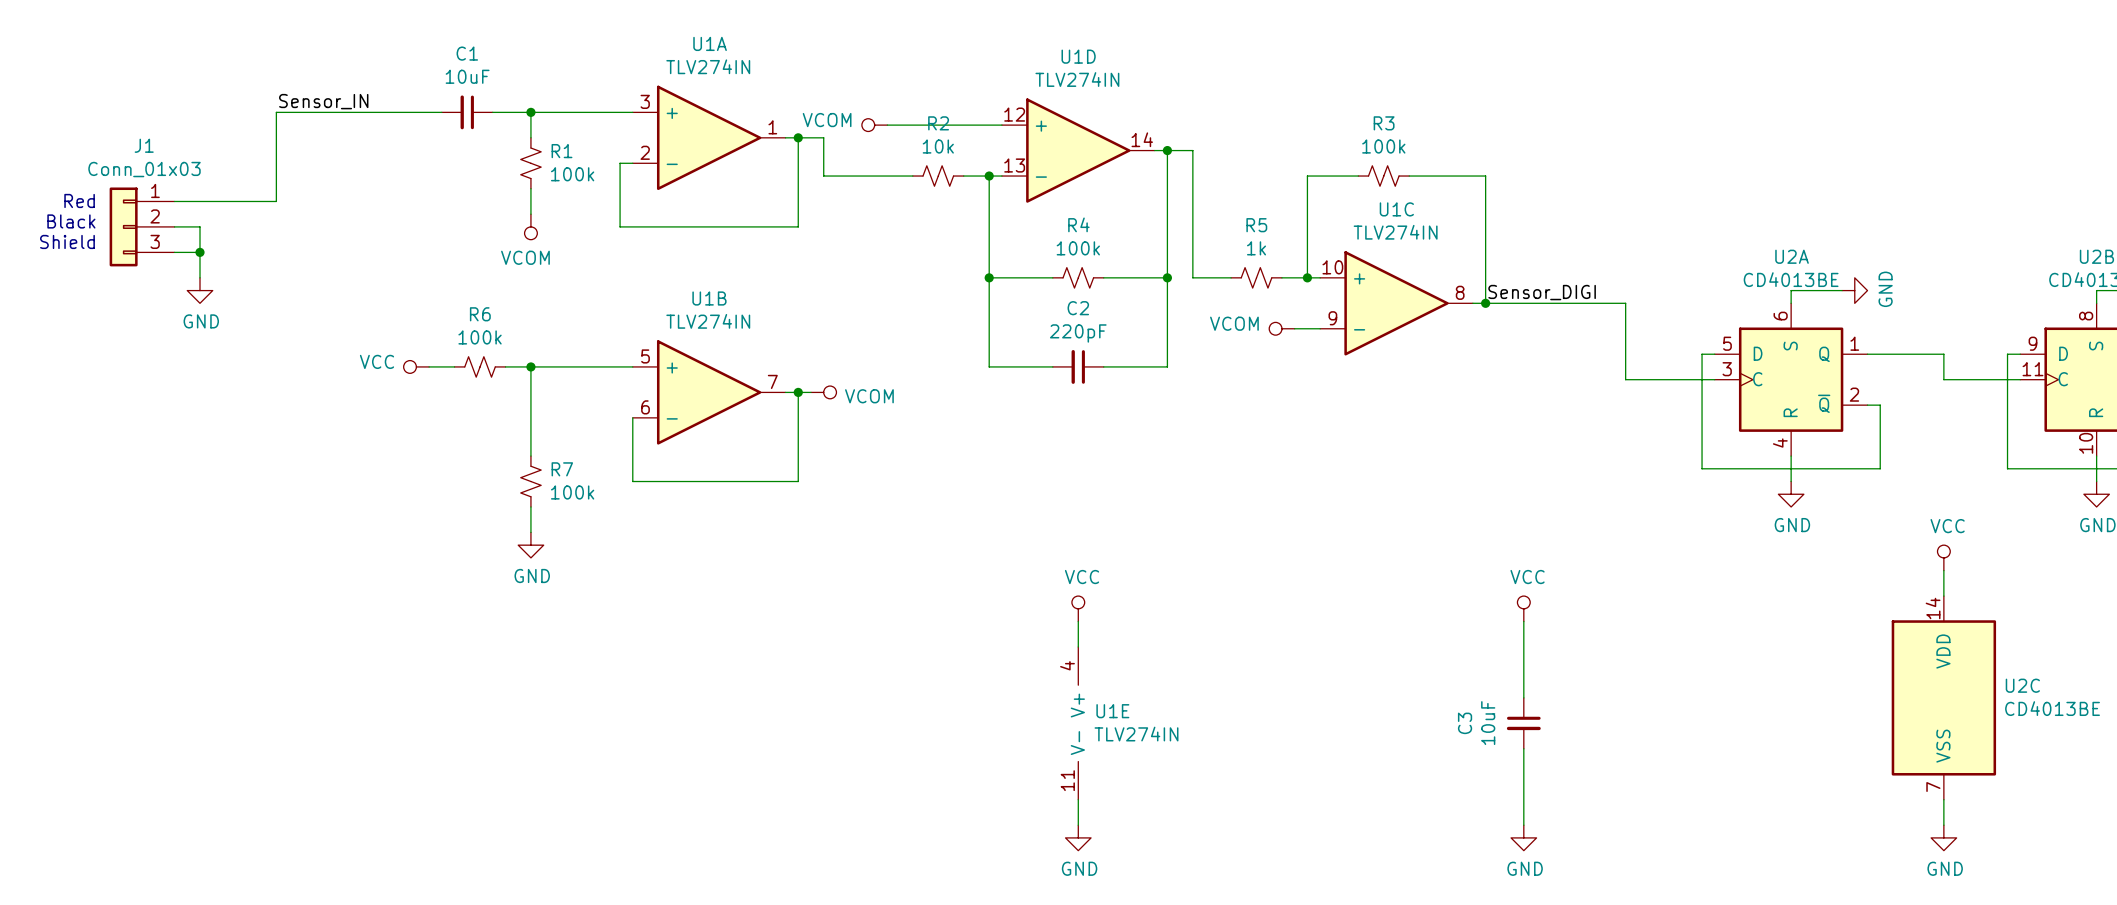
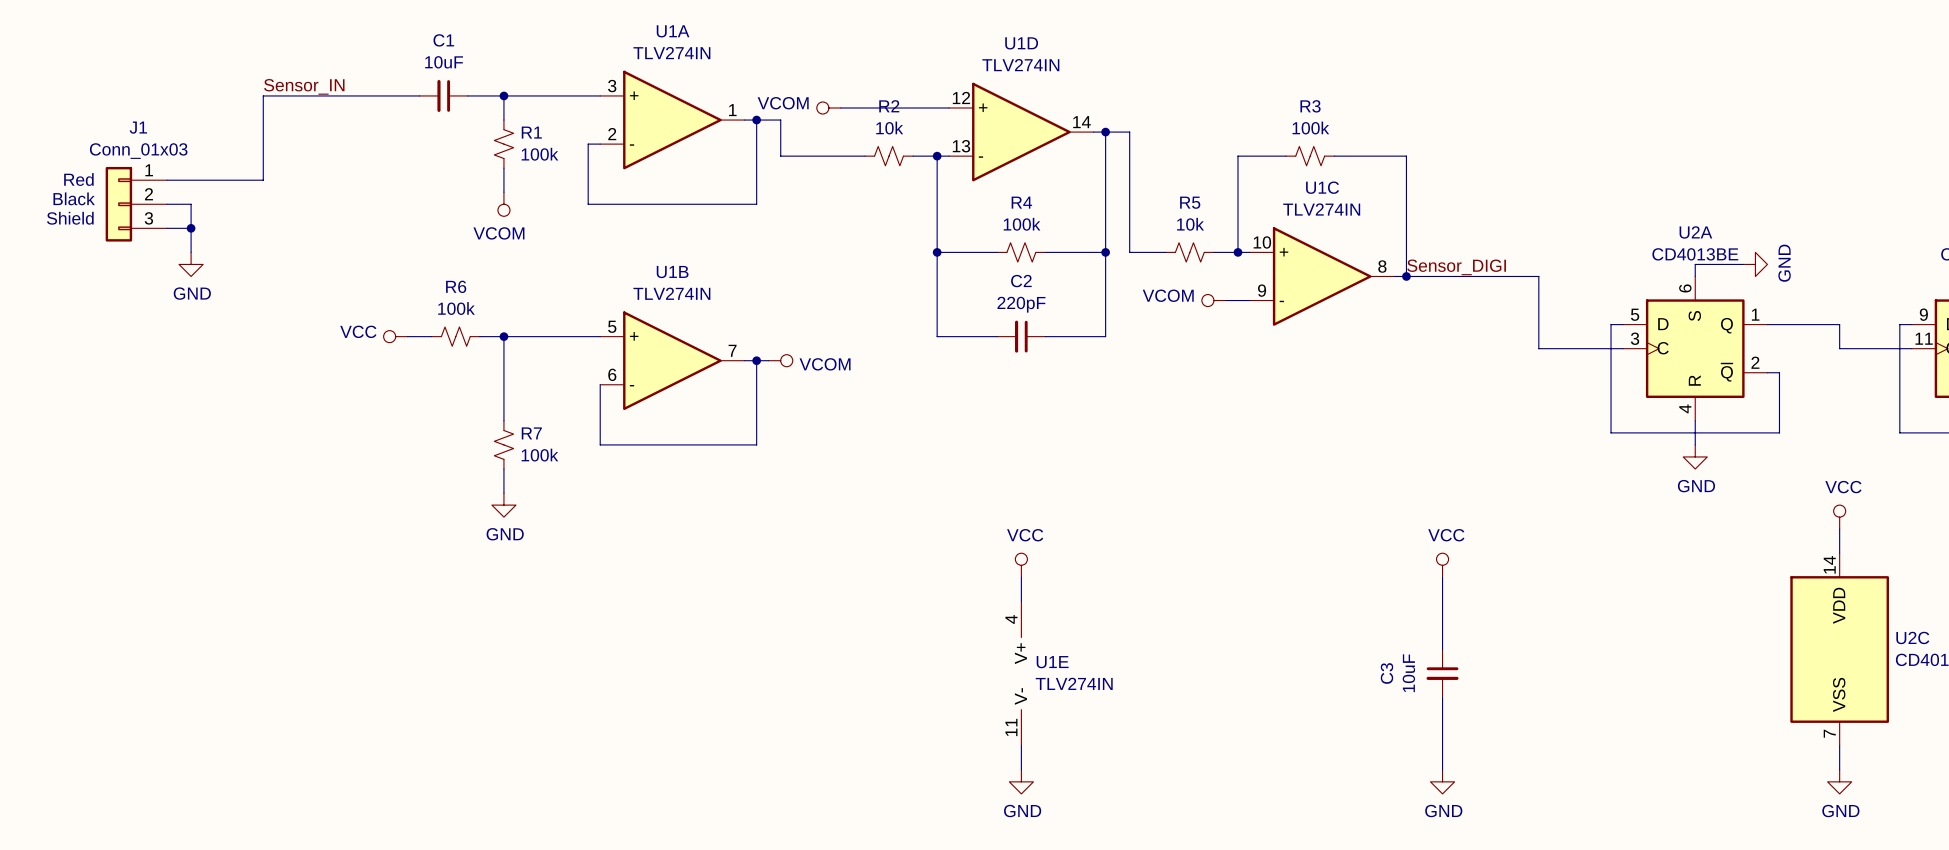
R5 value: 1k (1256, 248) -> 10k (1190, 224)

